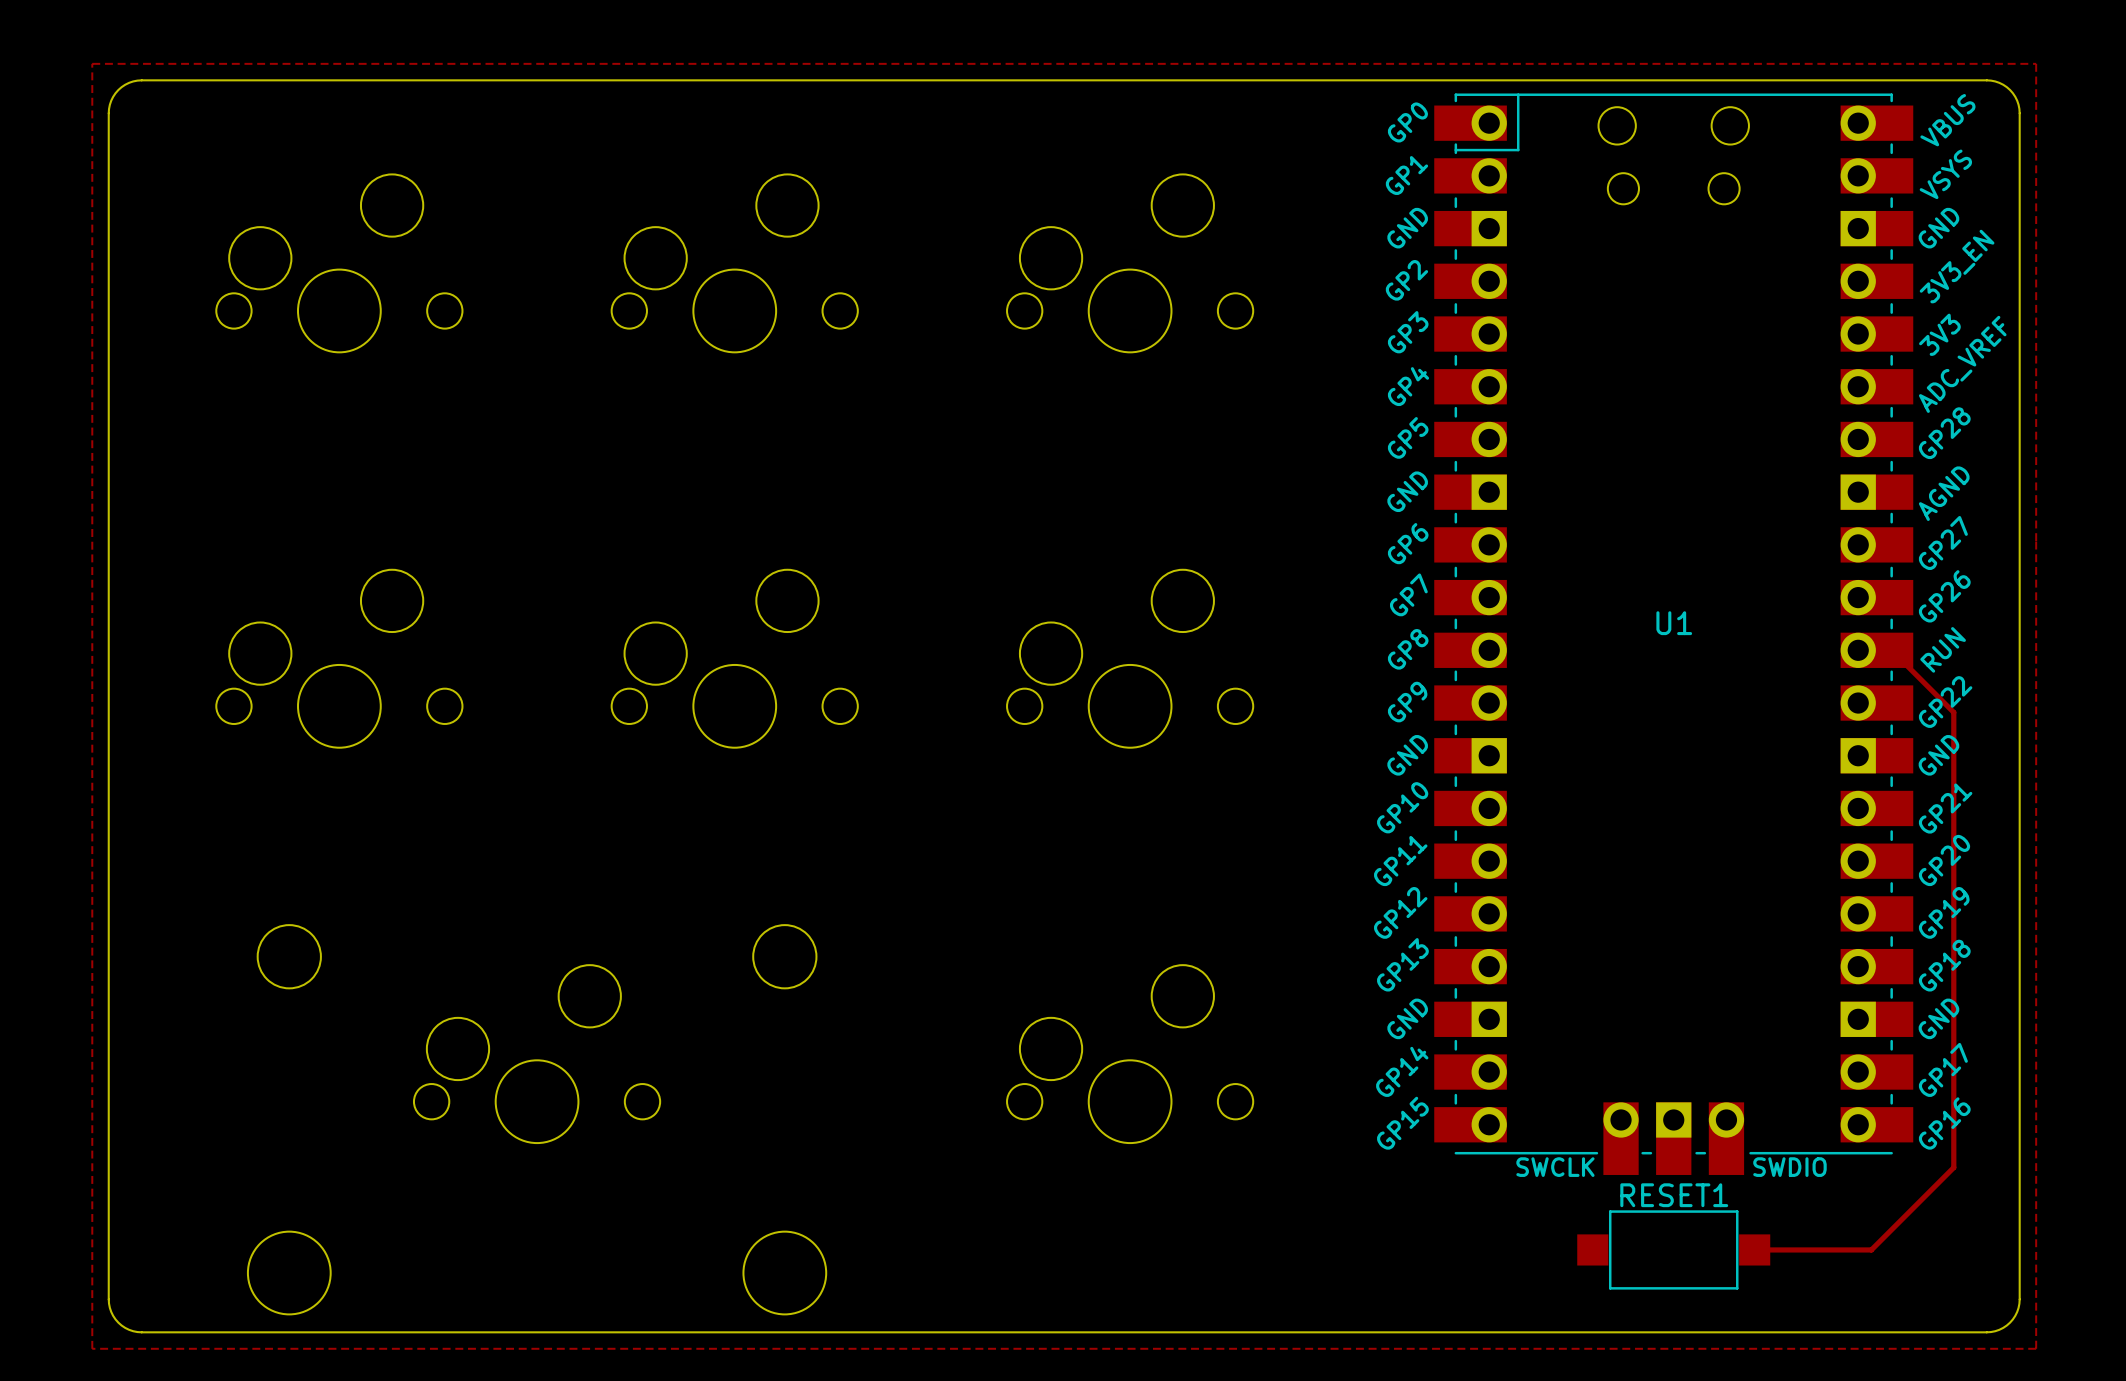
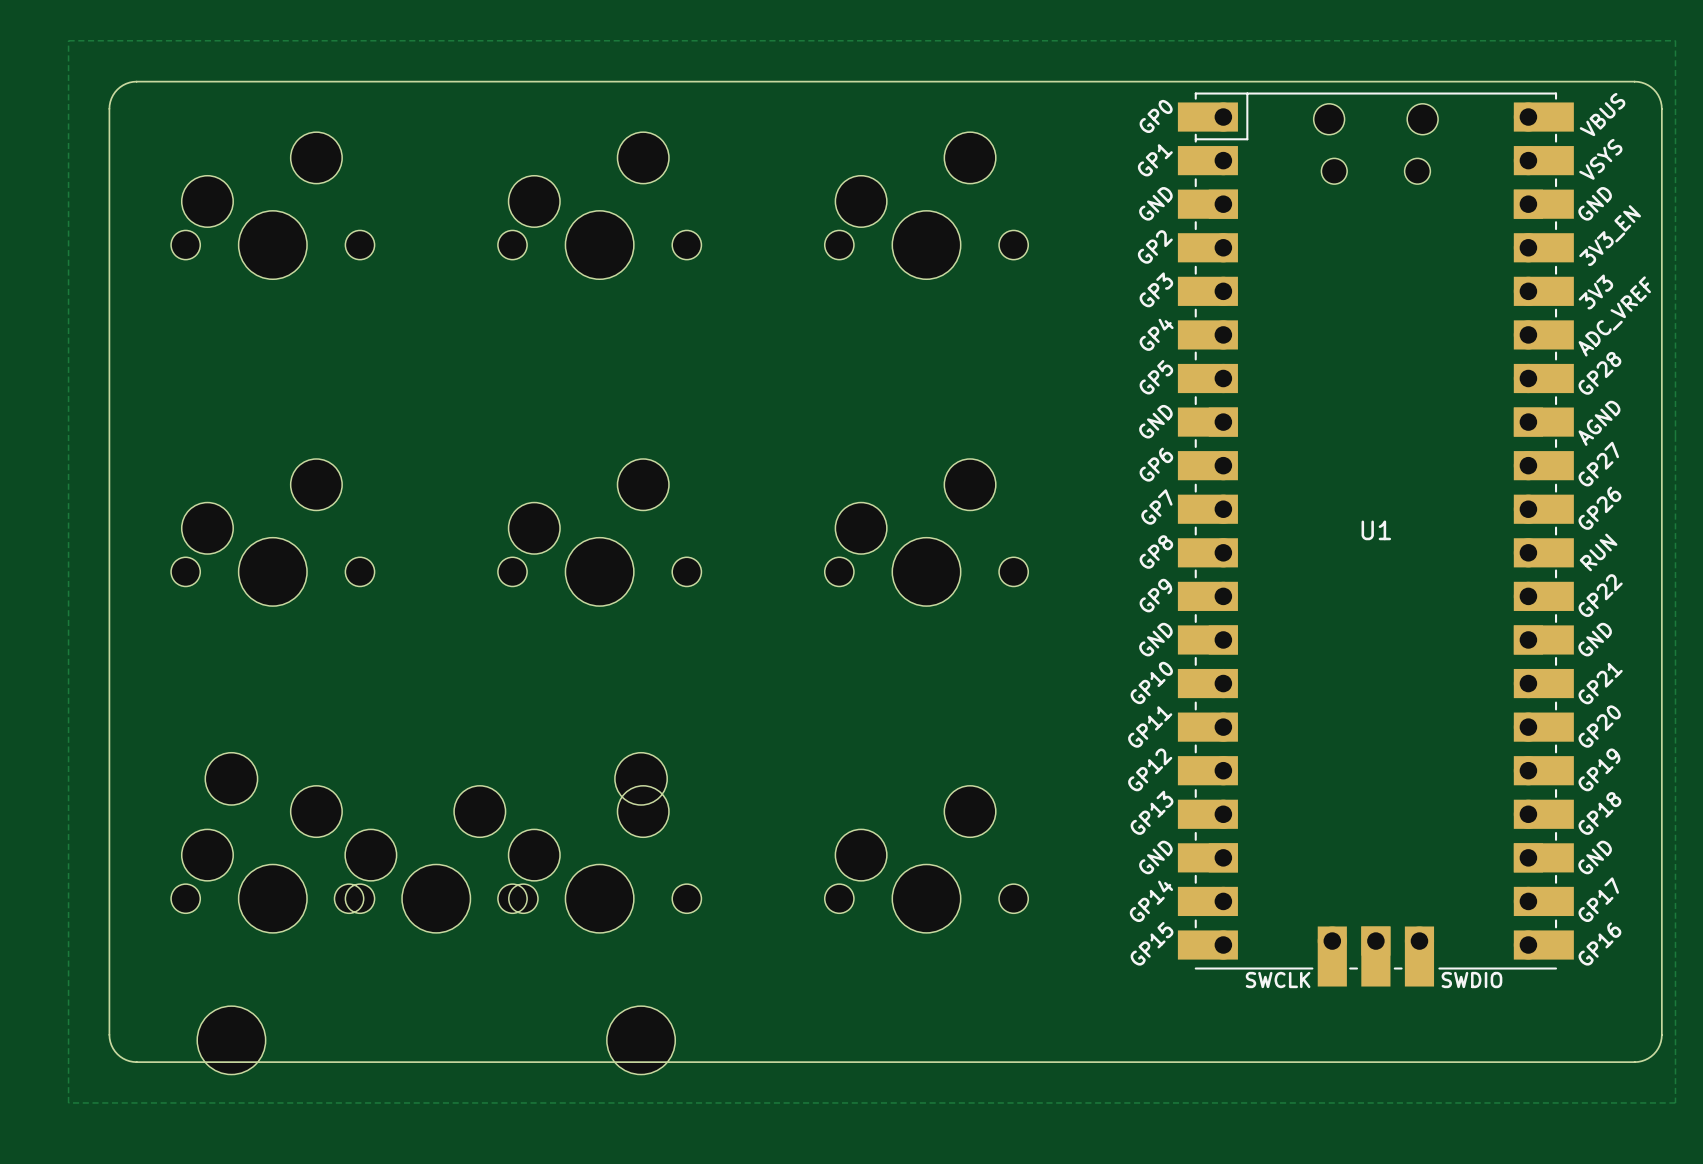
board edge: (2019, 146) (2019, 108) (2015, 96) (2003, 84) (1986, 80) (141, 80) (129, 82) (118, 89) (111, 100) (108, 113) (108, 1299) (113, 1315) (125, 1327) (141, 1332) (1986, 1332) (2003, 1327) (2015, 1315) (2019, 1303) (2019, 1266) -> (1661, 108) (1659, 98) (1653, 89) (1645, 83) (1634, 81) (136, 81) (126, 83) (117, 89) (111, 98) (109, 108) (109, 1034) (113, 1048) (123, 1058) (136, 1062) (1634, 1062) (1645, 1060) (1653, 1054) (1659, 1045) (1661, 1034)
U1 position: (1673, 634) -> (1375, 539)
track: (1858, 650) (1891, 650) (1953, 712) (1953, 1167) (1871, 1249) (1754, 1249) -> none
part: none -> (272, 859)
part: none -> (599, 859)
RESET1: (1673, 1249) -> none

